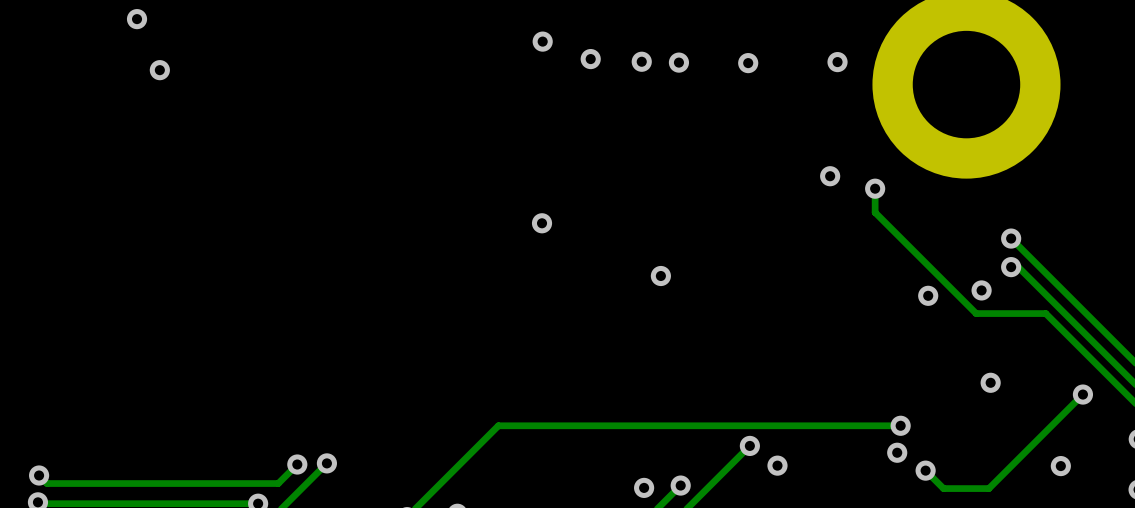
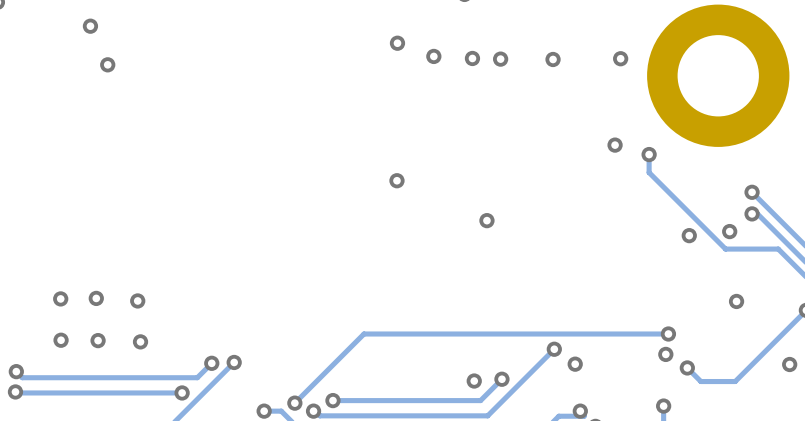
via: none -> (96, 298)
via: none -> (60, 298)
via: none -> (137, 300)
via: none -> (61, 340)
via: none -> (98, 340)
via: none -> (140, 341)

